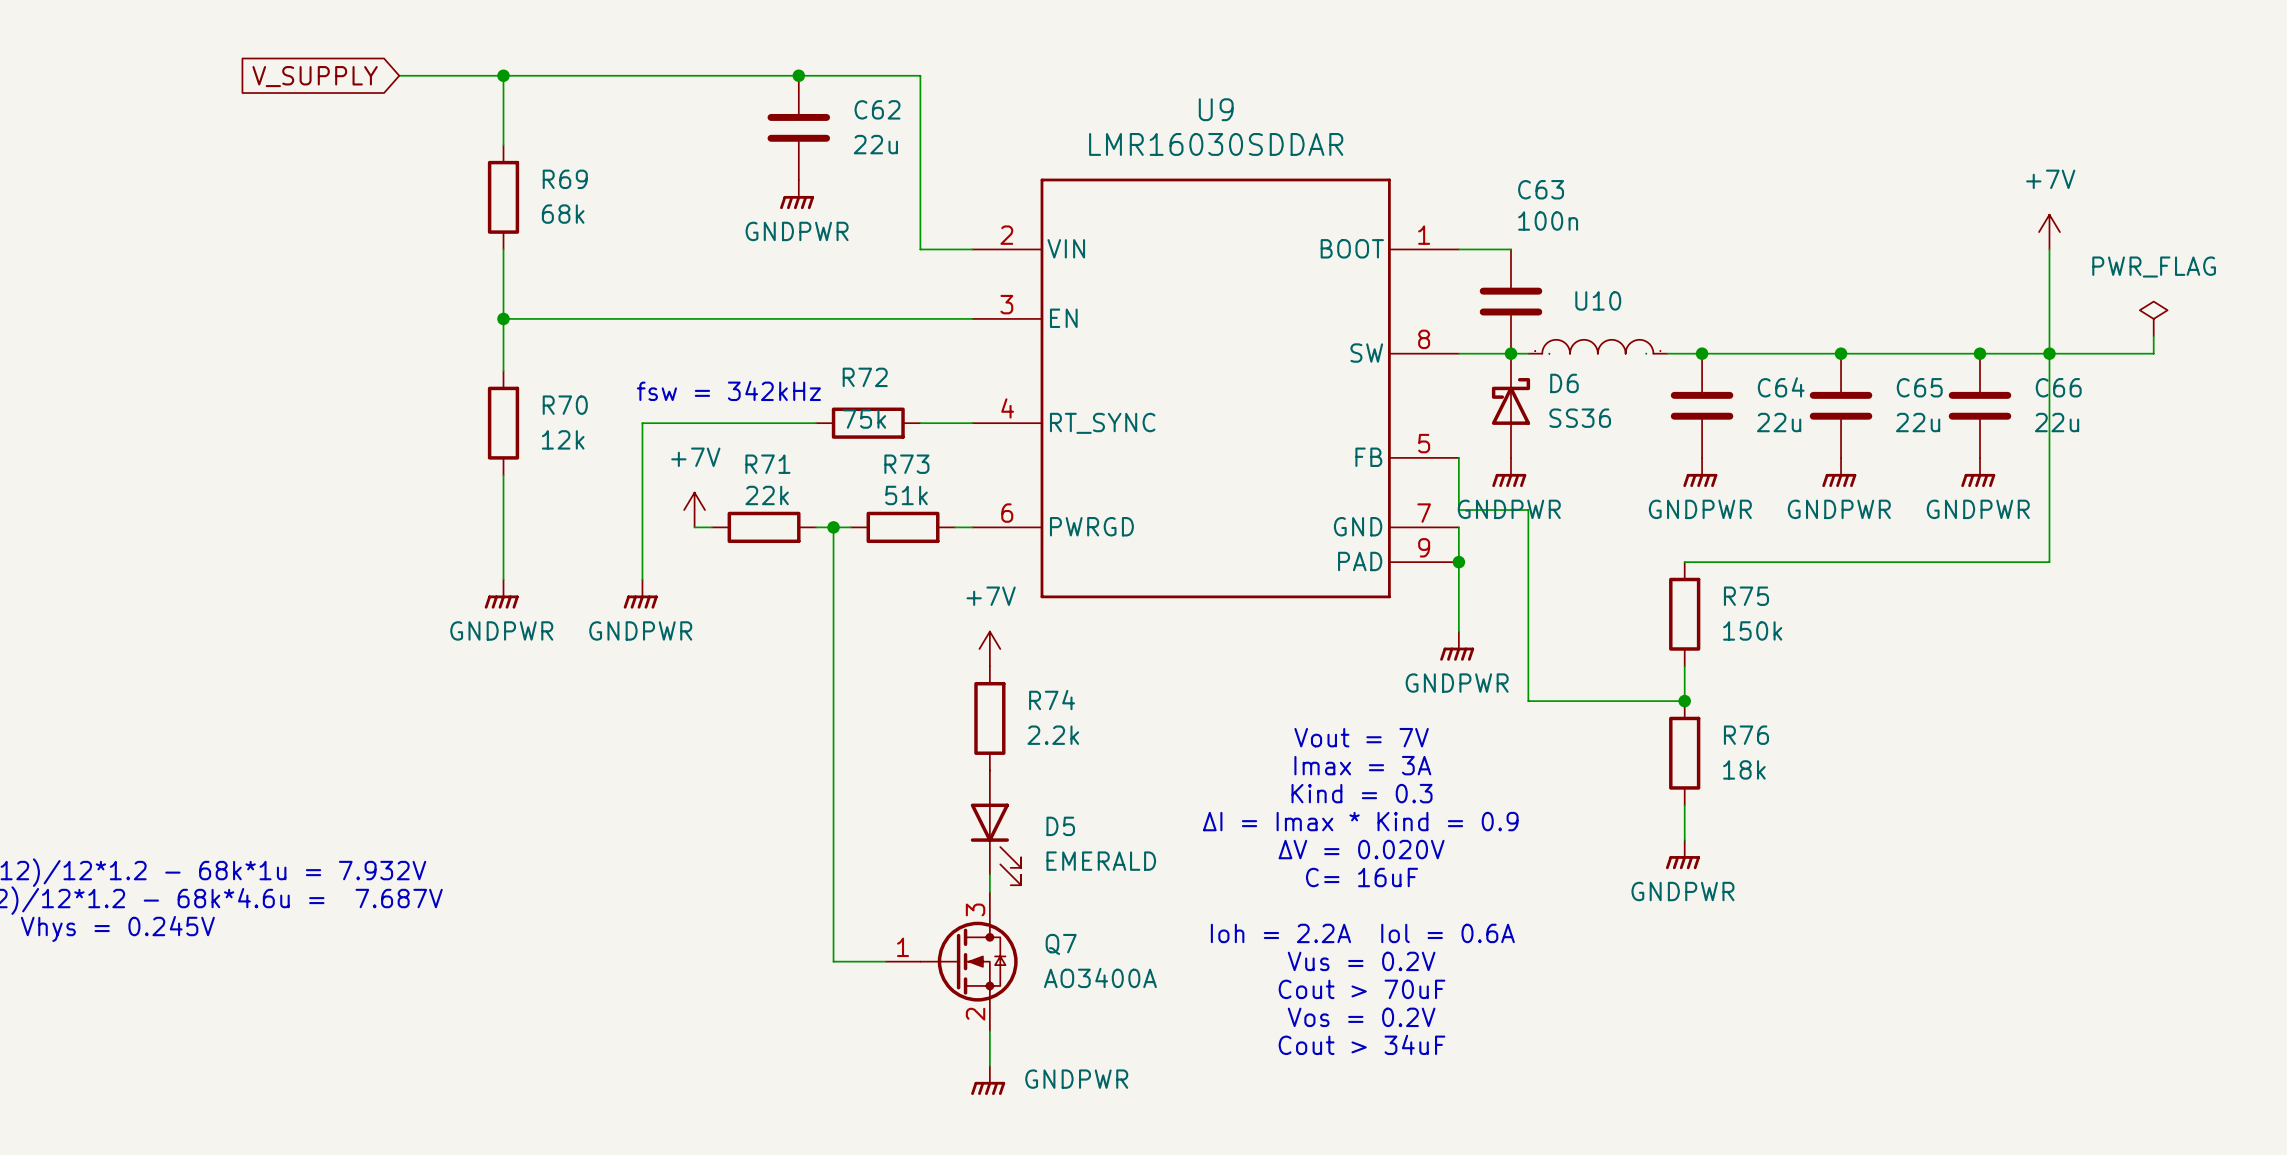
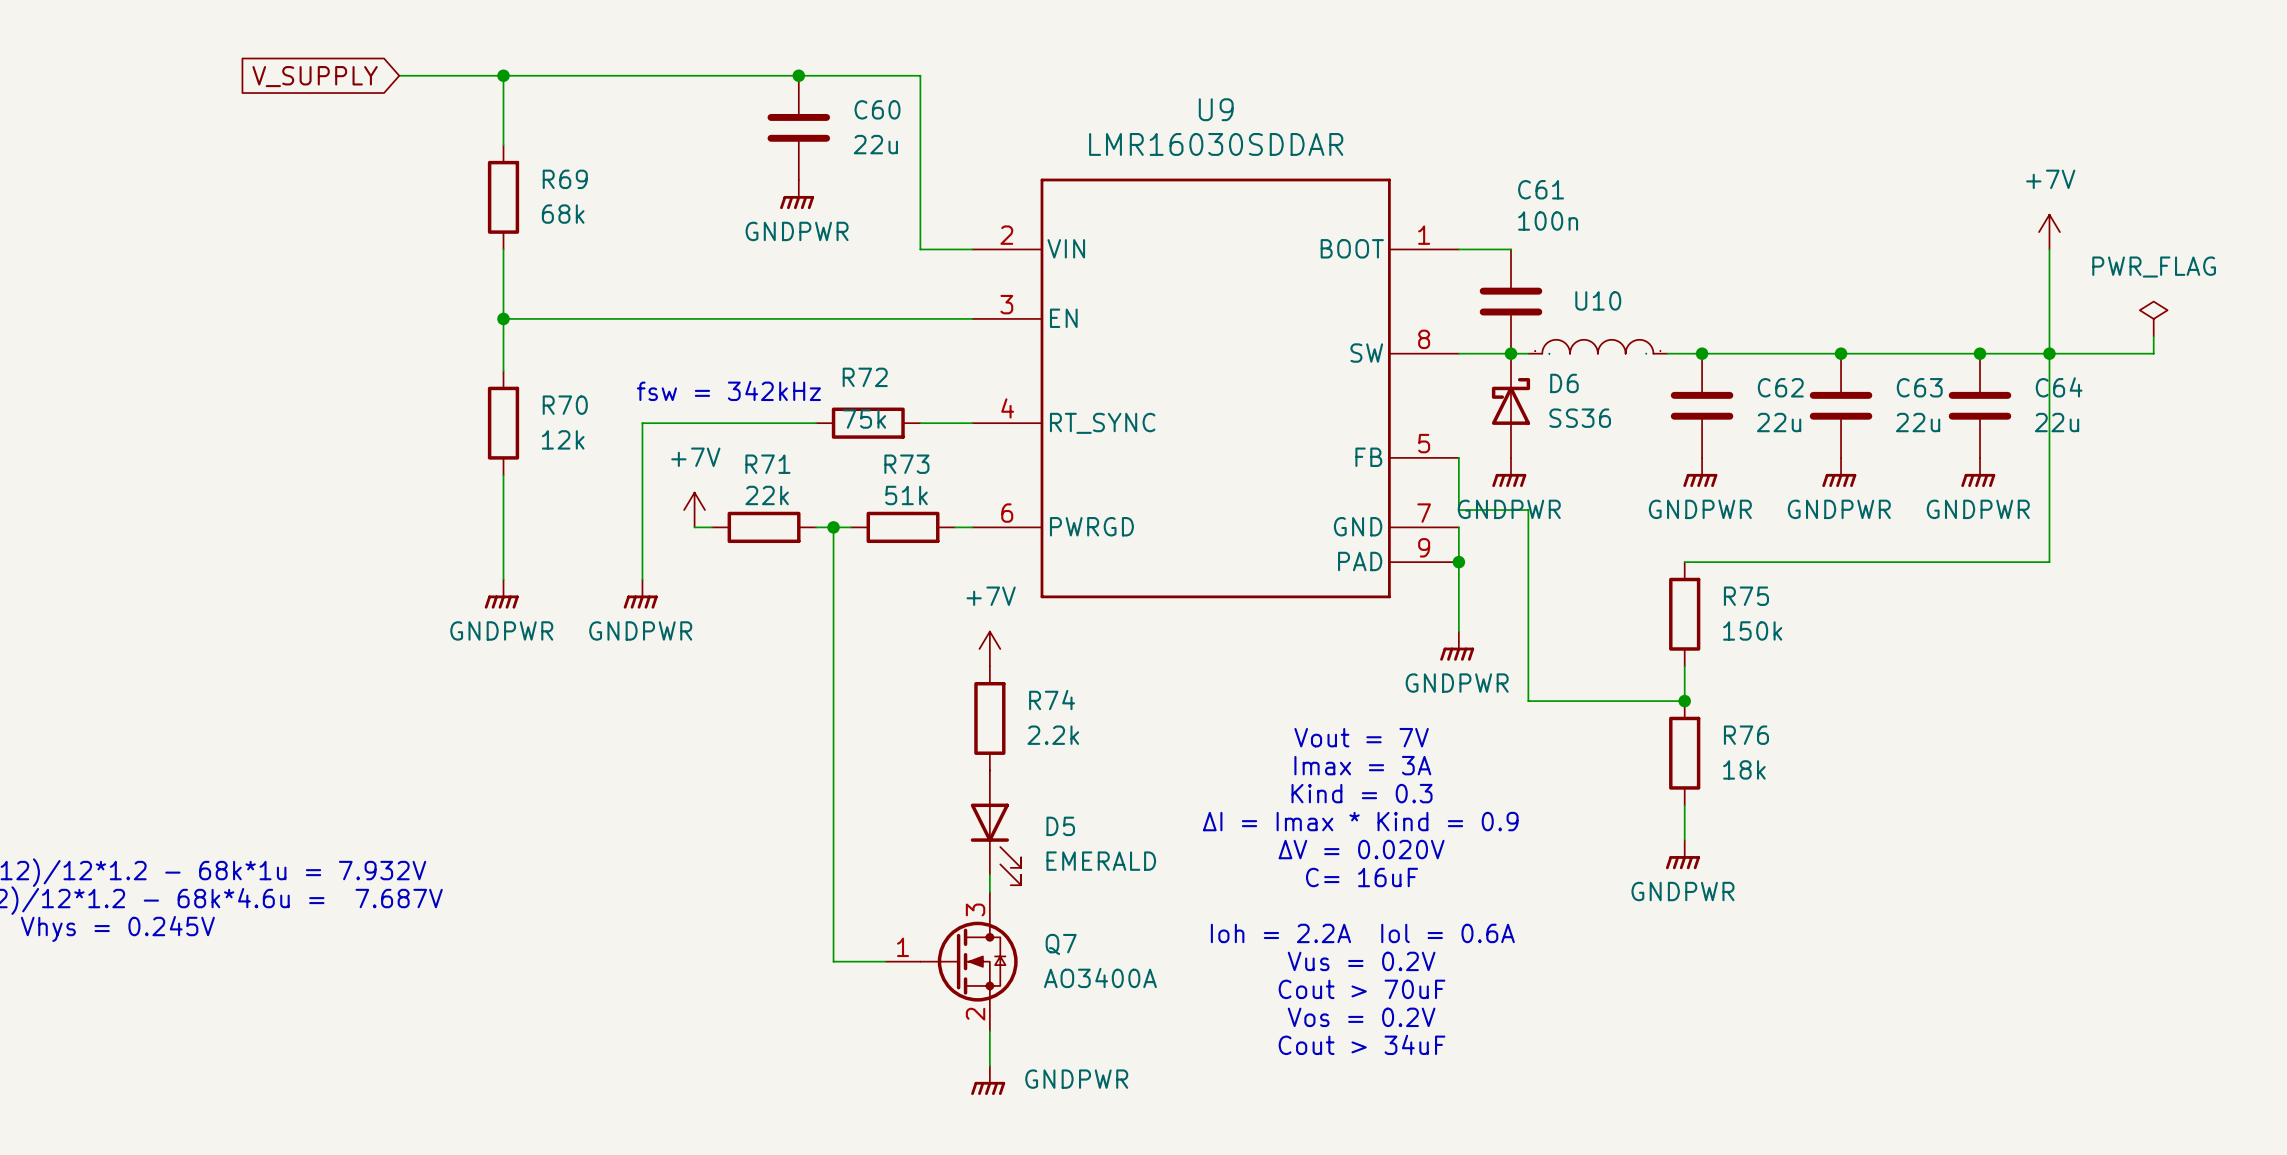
C62 name: C62 (877, 109) -> C60 (877, 109)
C63 name: C63 (1541, 189) -> C61 (1541, 189)
C64 name: C64 (1781, 387) -> C62 (1780, 387)
C65 name: C65 (1919, 387) -> C63 (1919, 387)
C66 name: C66 (2058, 387) -> C64 (2059, 387)

